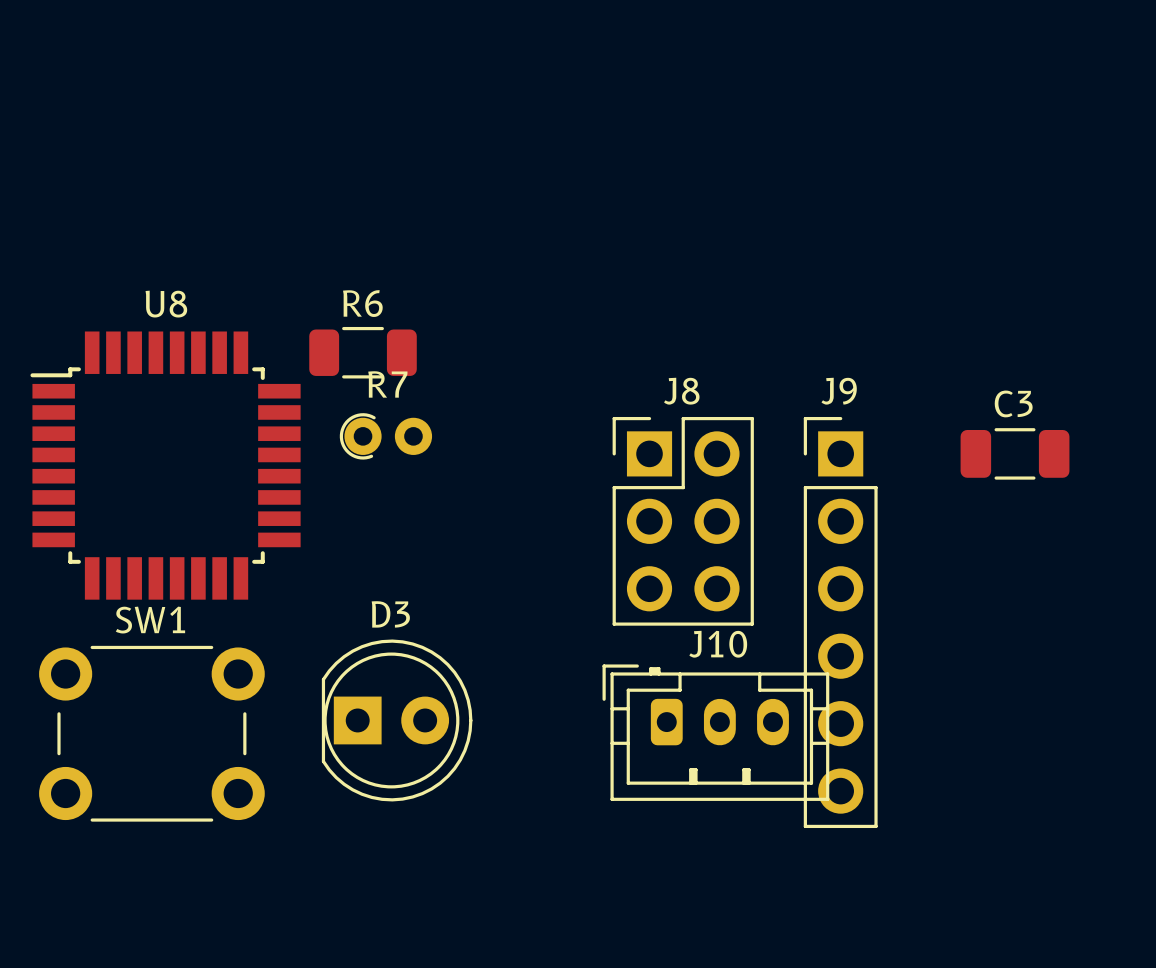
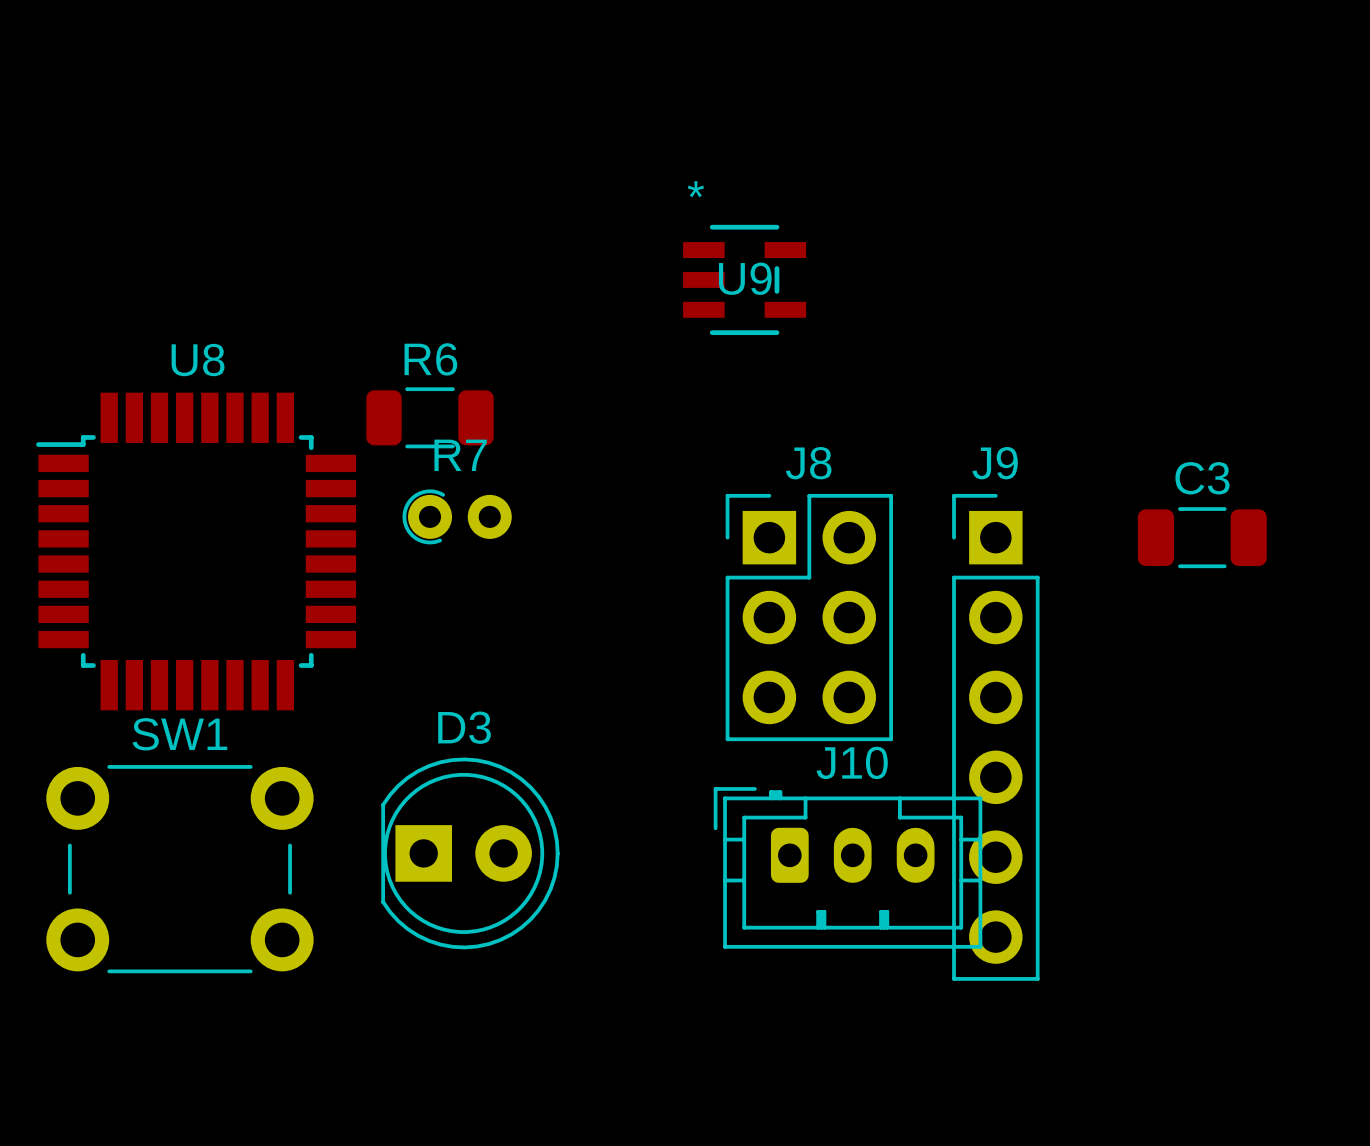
U9: none -> (744, 279)

